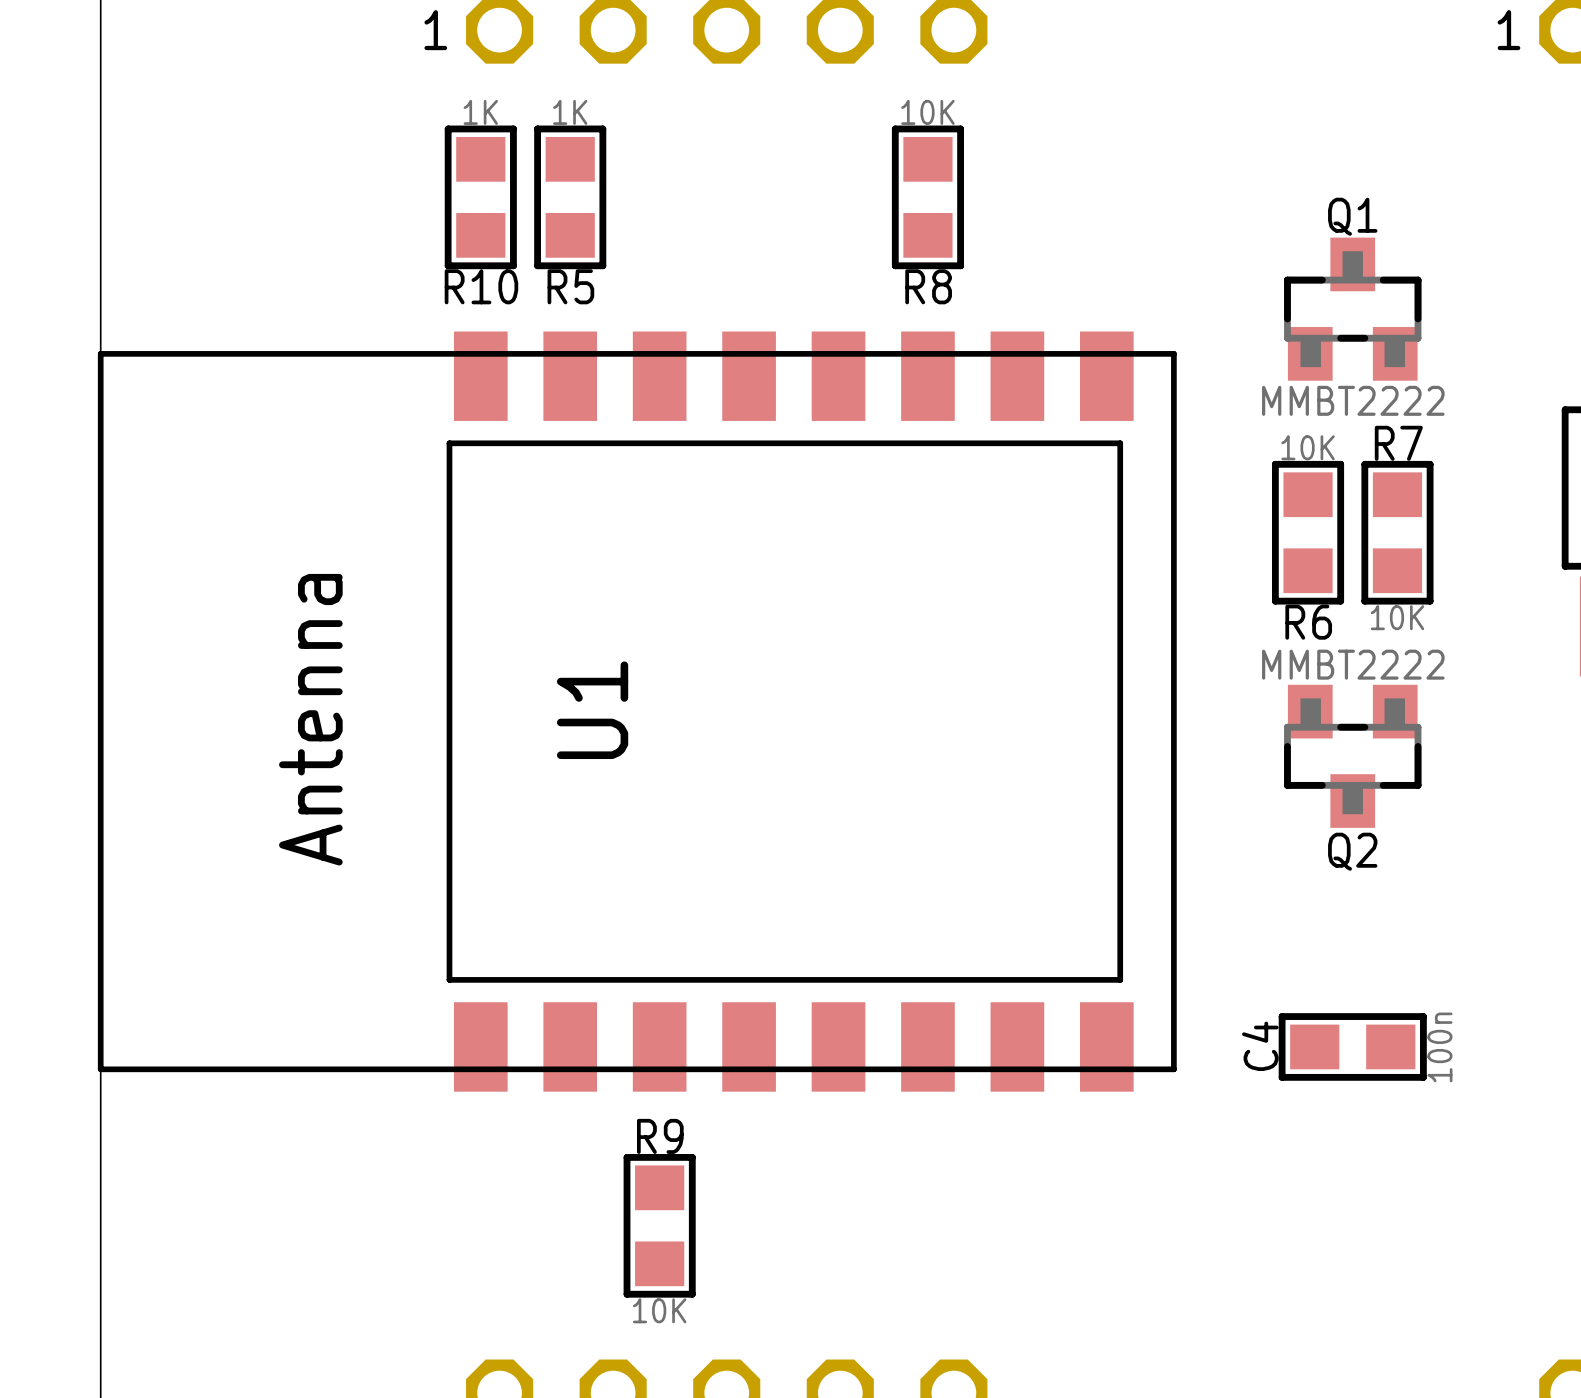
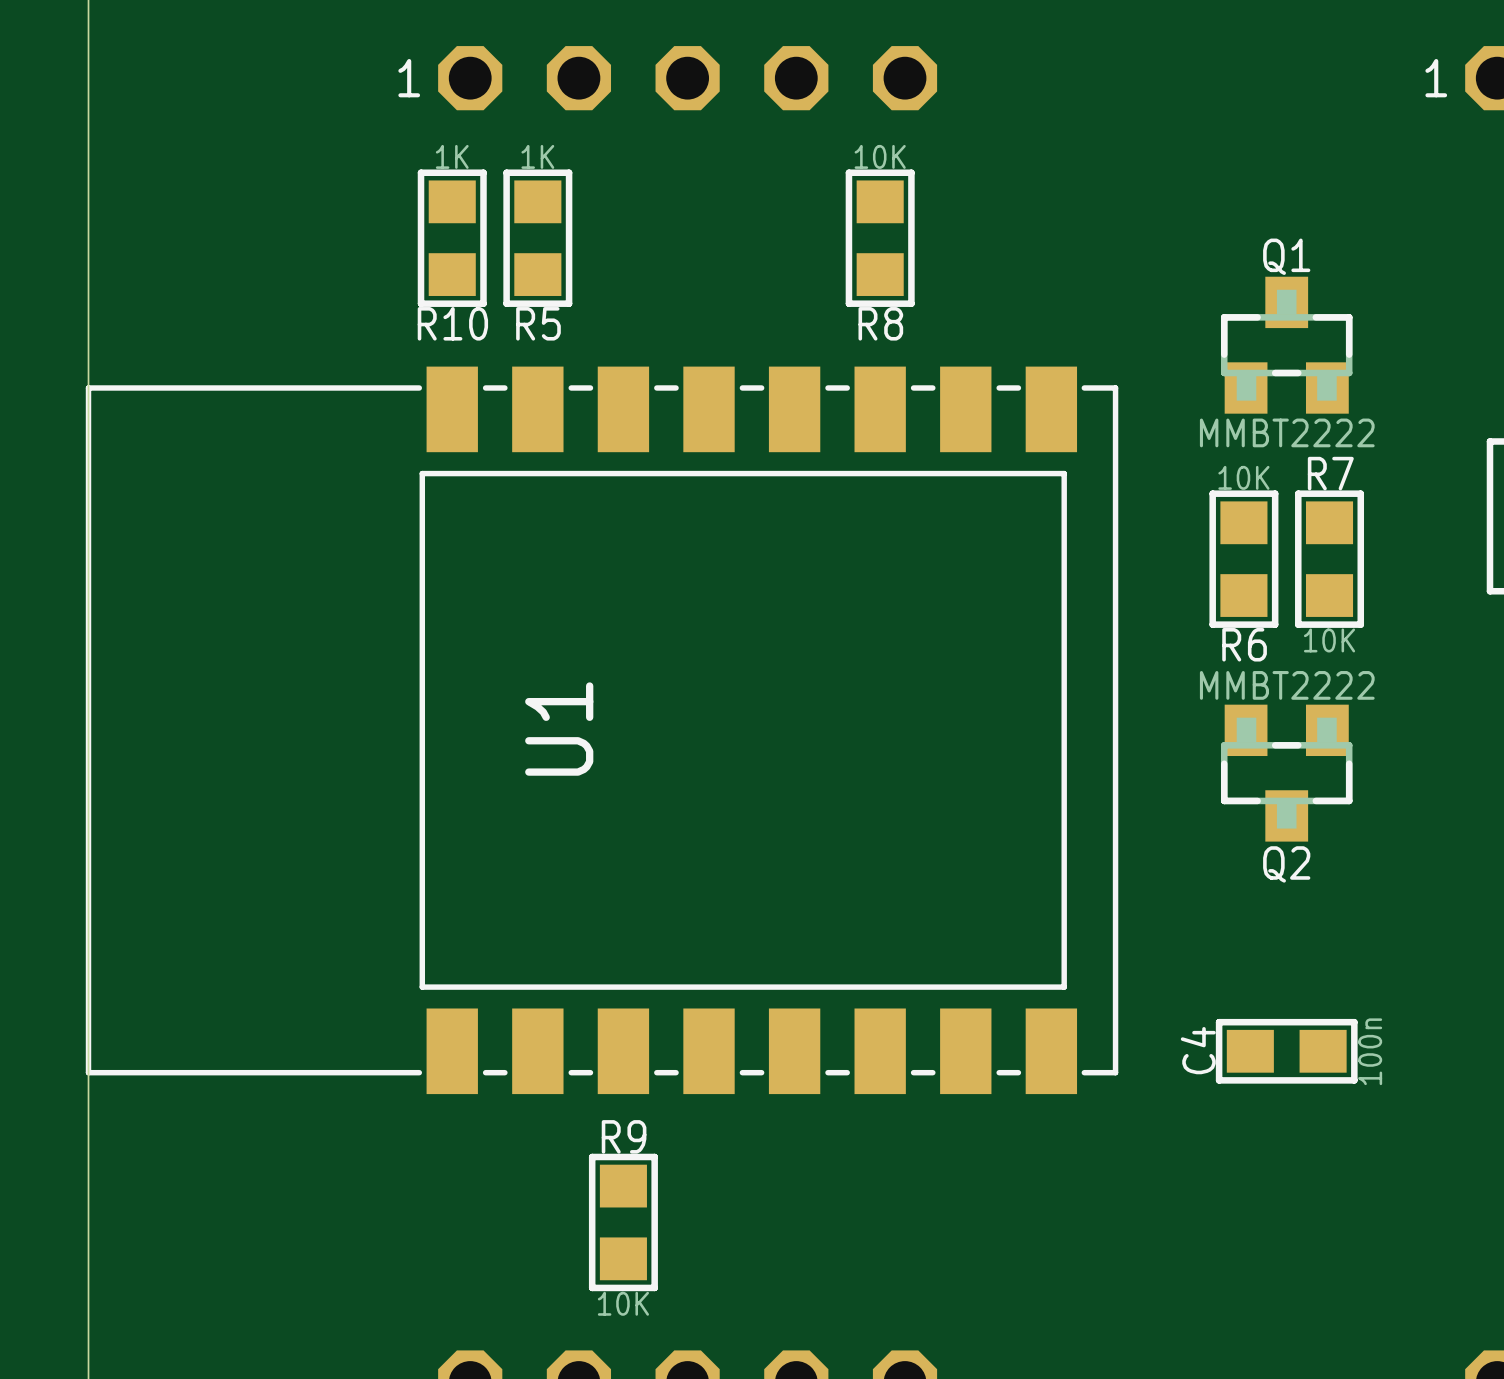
U1 footprint: [97, 331, 1177, 1092] -> [85, 366, 1119, 1095]

